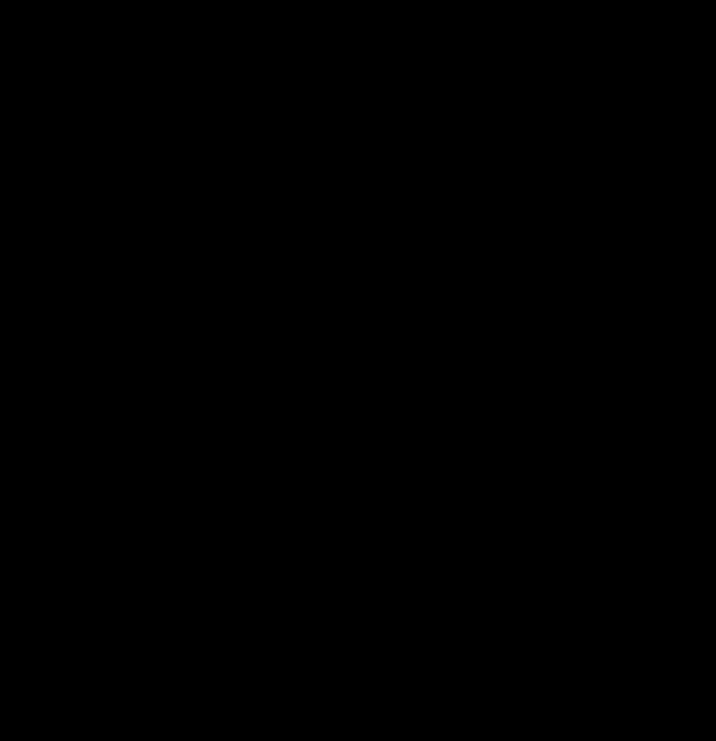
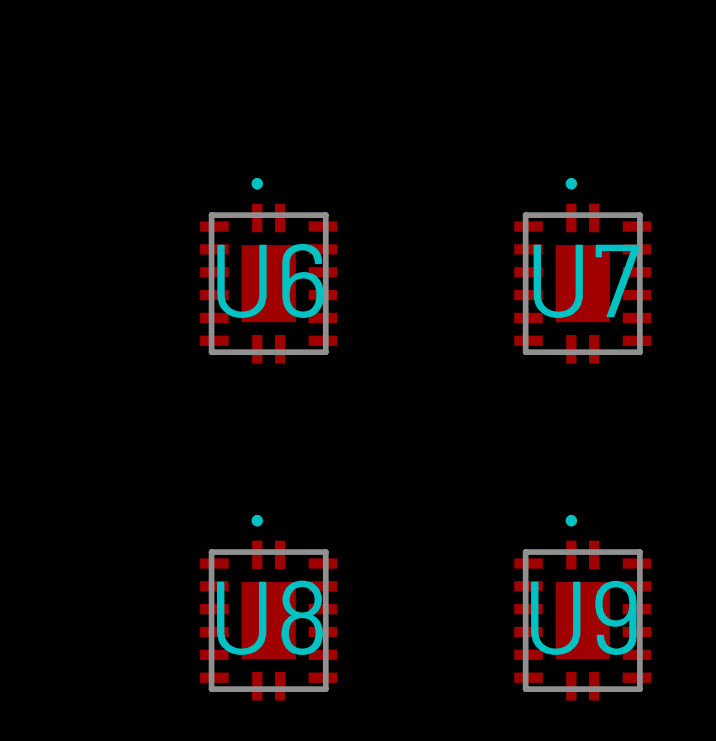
U6: none -> (268, 270)
U7: none -> (582, 270)
U8: none -> (268, 607)
U9: none -> (582, 607)

